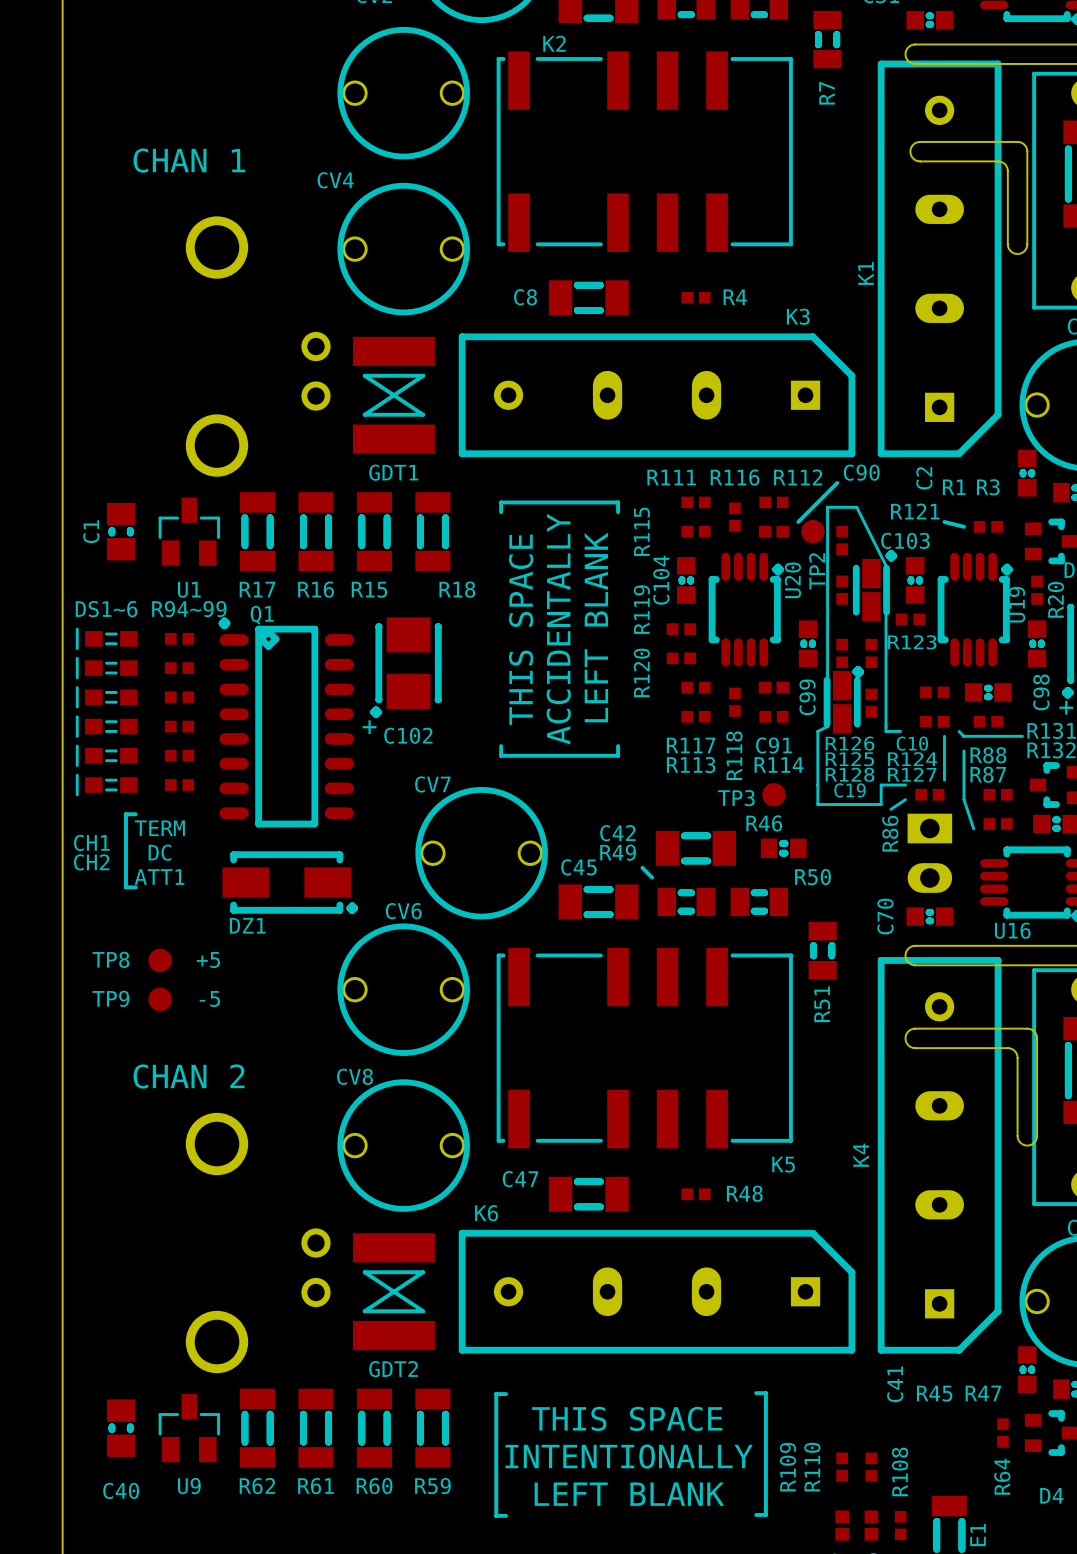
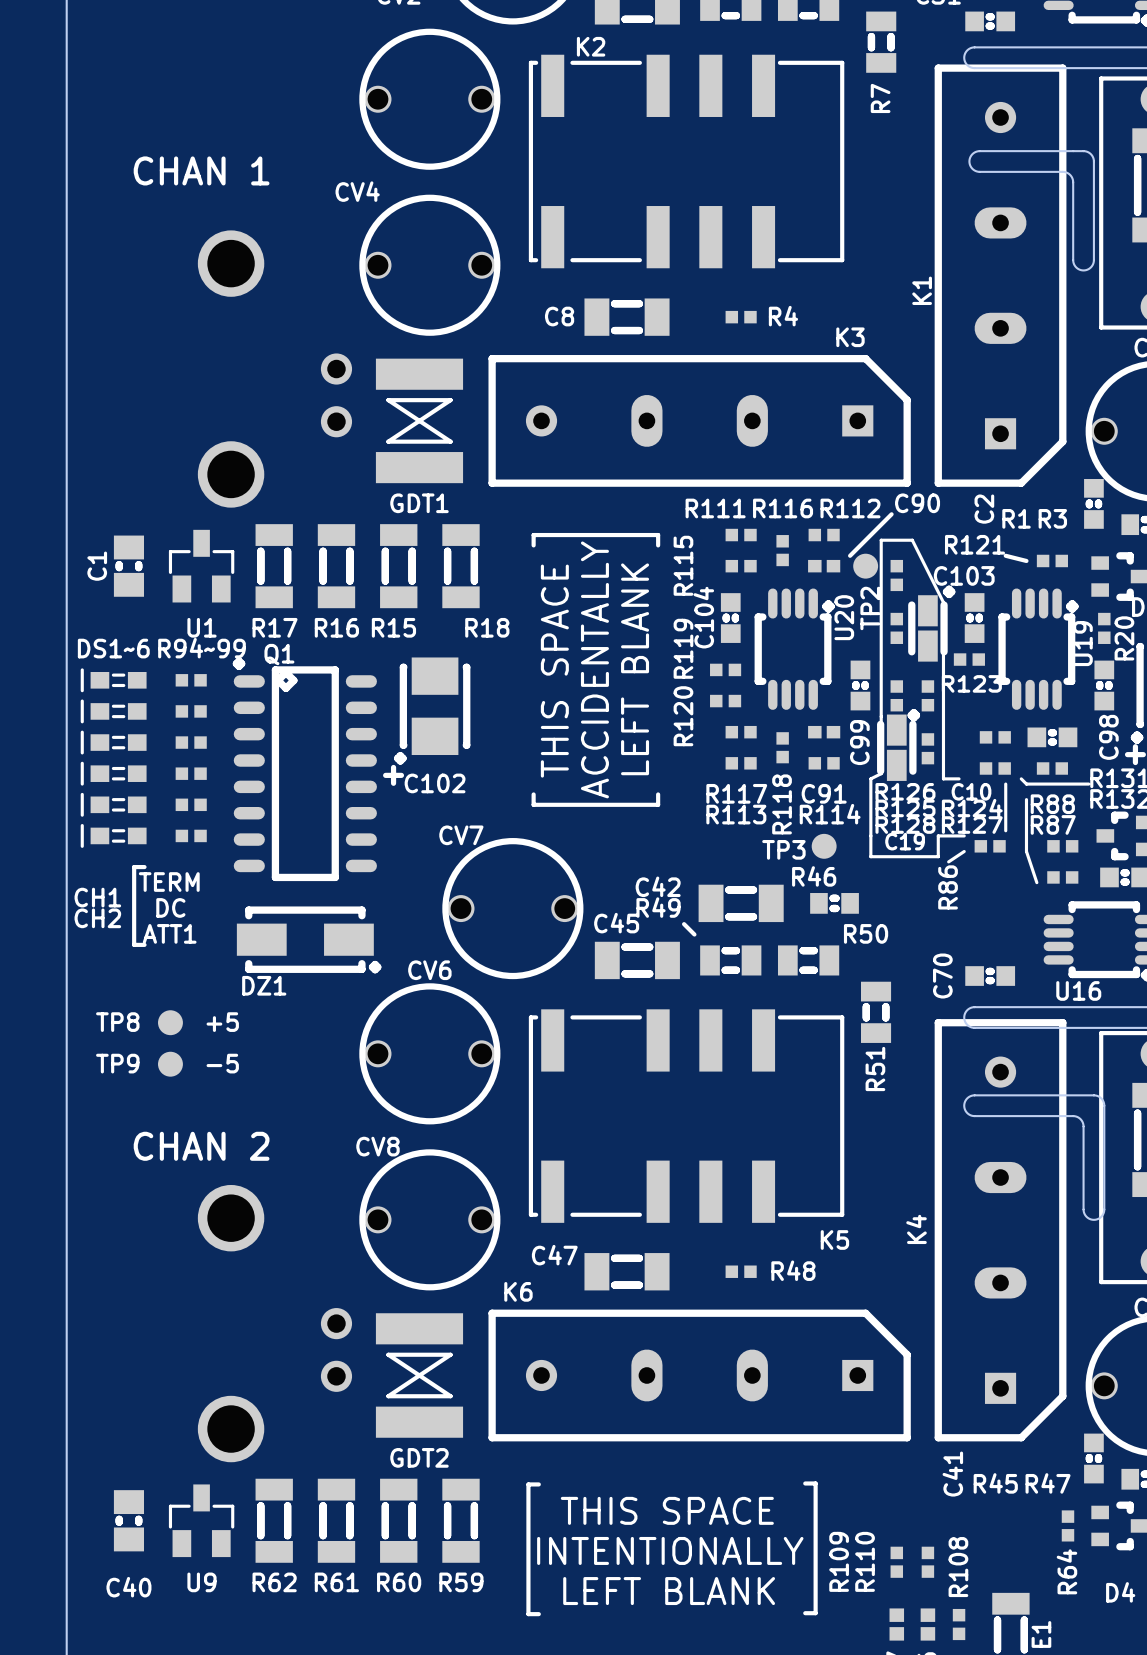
part: (929, 853) -> none

